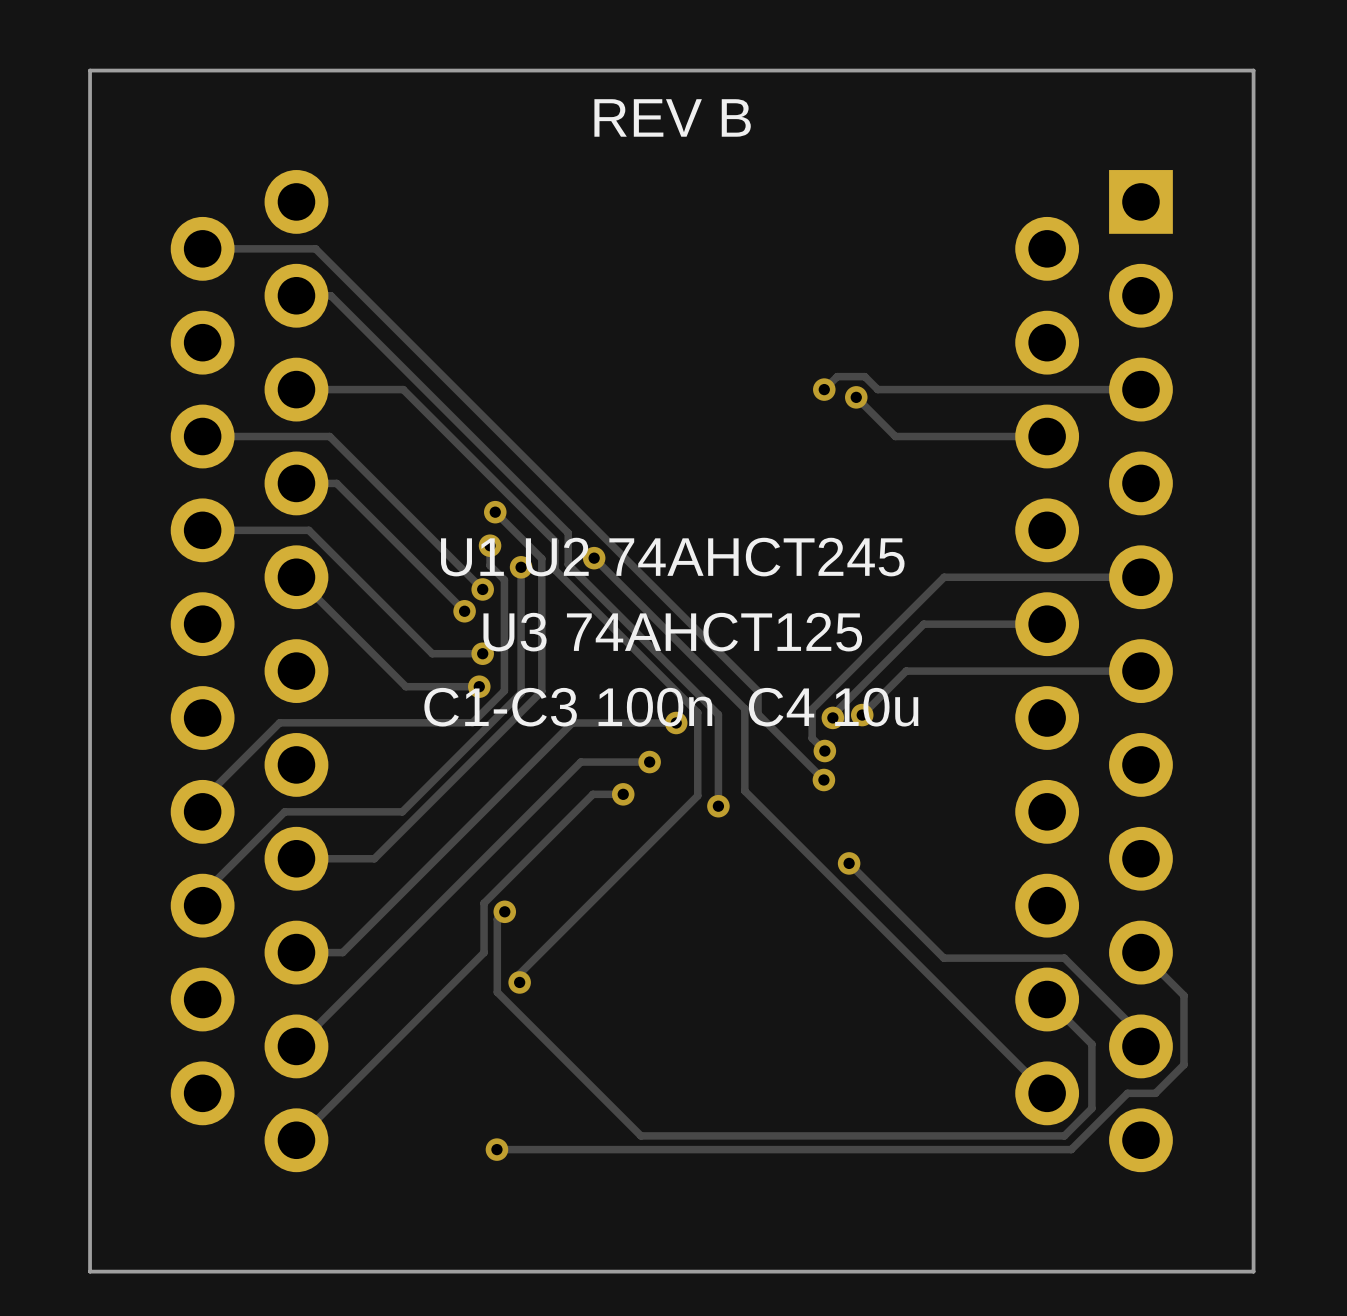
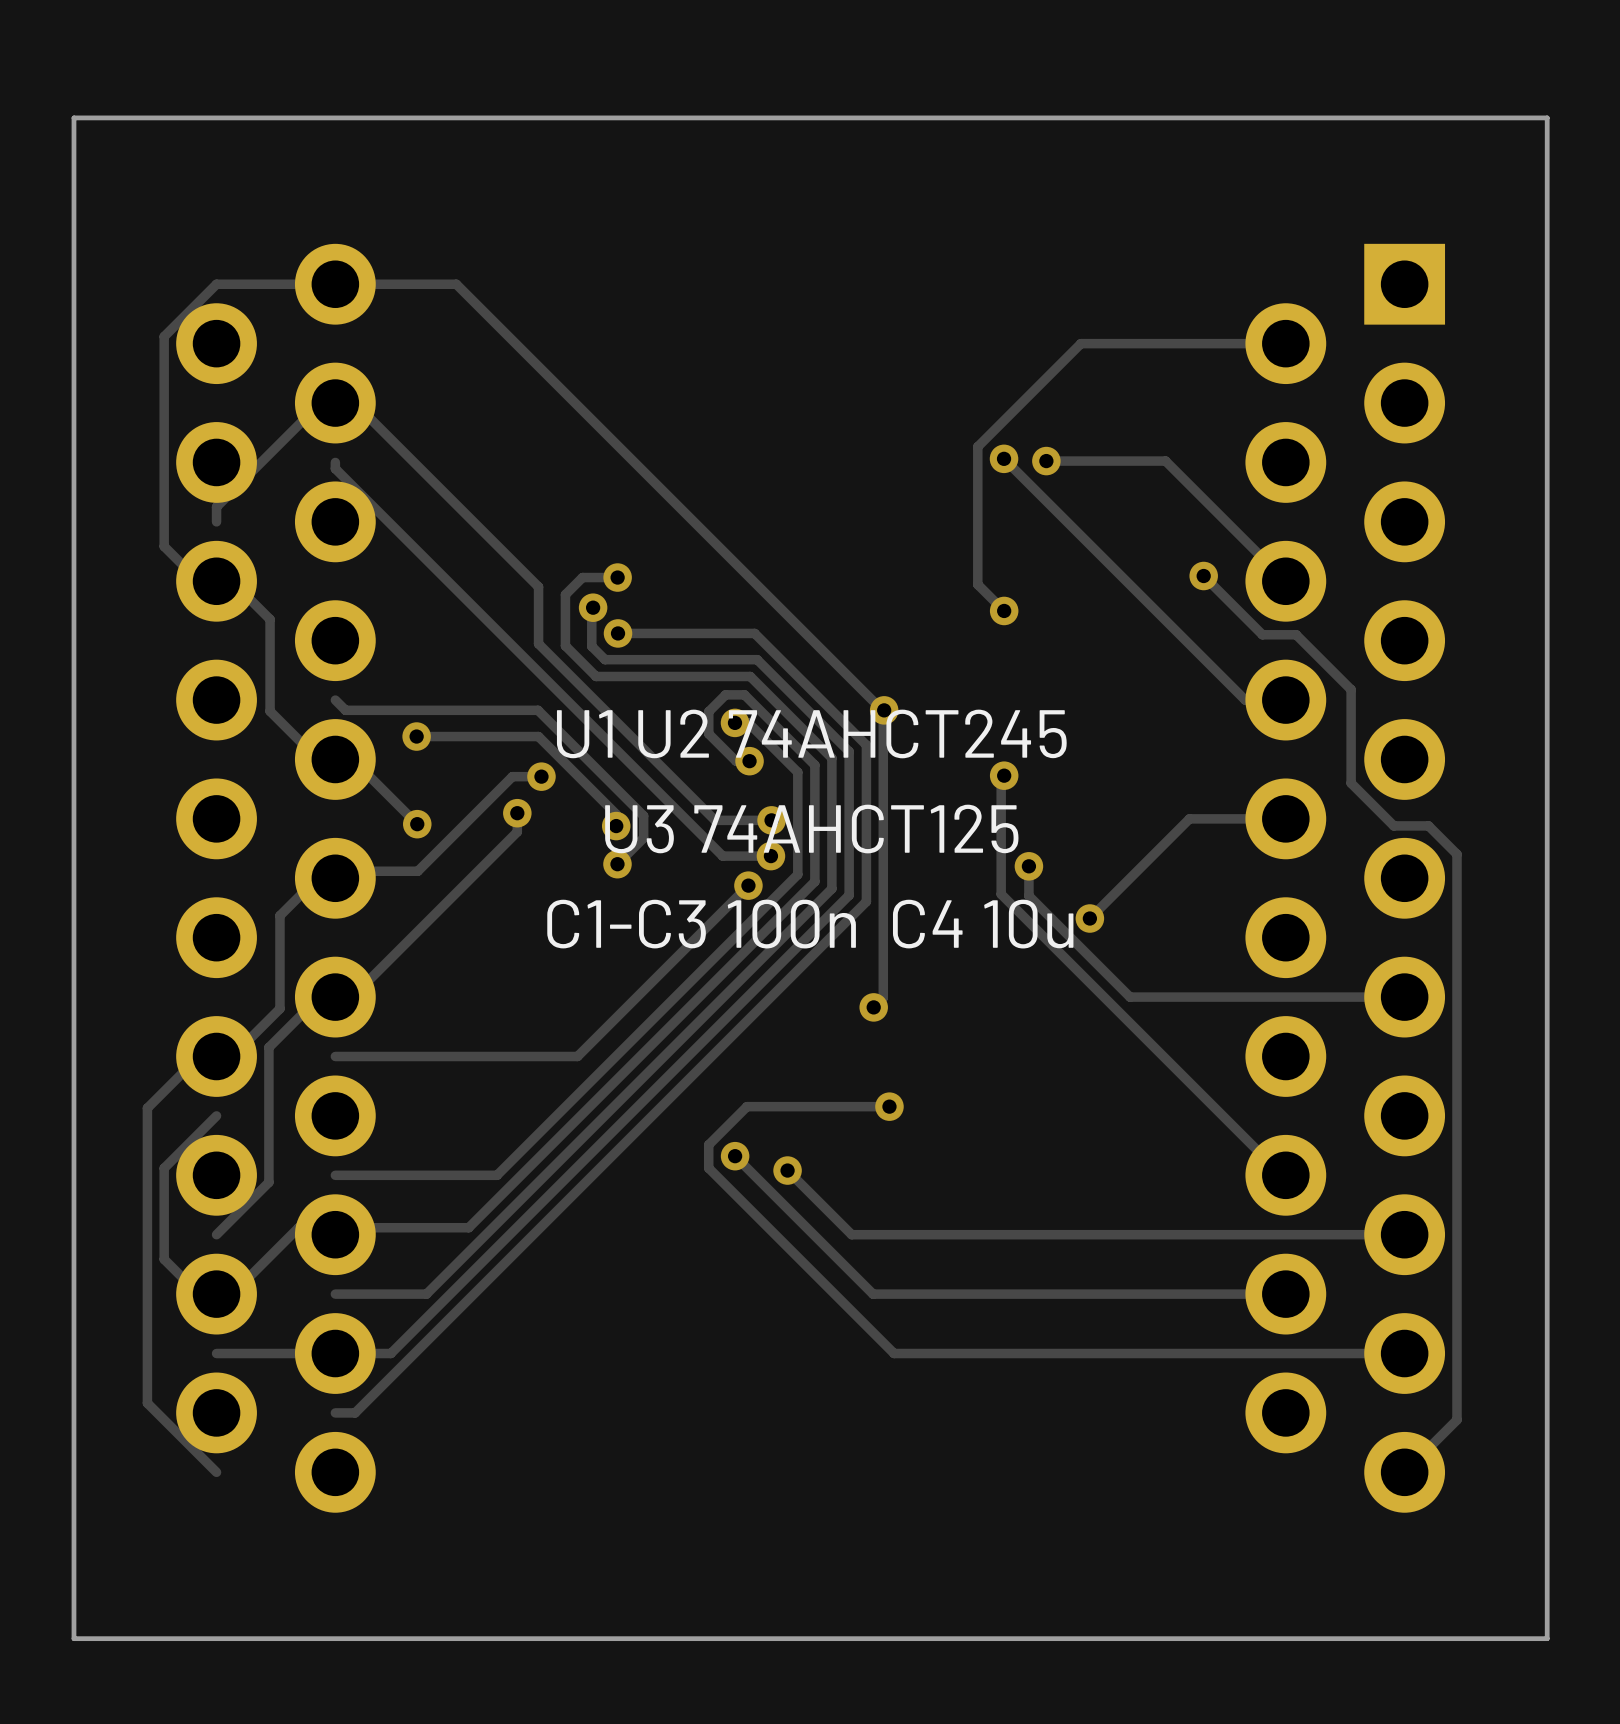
text: REV B (672, 117) -> none
track: (202, 248) (315, 248) (758, 691) (758, 714) (823, 780) -> none
track: none -> (1285, 343) (1080, 343) (977, 446) (977, 584) (1004, 610)
track: (296, 295) (330, 295) (568, 533) (568, 564) (718, 714) (718, 806) -> none
track: none -> (1004, 458) (1245, 700) (1285, 700)
via: none -> (1004, 458)
via: none -> (1046, 461)
track: none -> (335, 462) (335, 468) (722, 856) (770, 856)
track: none -> (216, 521) (216, 507) (314, 409) (361, 409) (538, 586) (538, 643) (715, 820) (771, 820)
track: (296, 389) (403, 389) (555, 541) (555, 569) (697, 712) (697, 795) (519, 973) (519, 982) -> none
via: (824, 389) -> none
track: (1140, 389) (877, 389) (864, 376) (837, 376) (824, 389) -> none
track: (856, 397) (895, 436) (1047, 436) -> (1046, 461) (1165, 461) (1285, 581)
via: (856, 397) -> none
track: none -> (1203, 576) (1262, 634) (1296, 634) (1351, 689) (1351, 783) (1393, 825) (1428, 825) (1457, 854) (1457, 1419) (1404, 1472)
via: none -> (1203, 576)
track: none -> (617, 577) (582, 577) (565, 594) (565, 645) (596, 676) (750, 676) (831, 758) (831, 888) (426, 1294) (335, 1294)
via: none -> (617, 577)
track: (202, 436) (329, 436) (482, 589) -> none
track: none -> (593, 607) (591, 646) (605, 659) (757, 659) (849, 751) (849, 895) (390, 1353) (216, 1353)
via: none -> (593, 607)
via: none -> (1004, 610)
track: none -> (618, 633) (754, 633) (866, 745) (866, 901) (355, 1412) (335, 1412)
via: none -> (618, 633)
track: (296, 483) (336, 483) (464, 611) -> none
track: (495, 512) (541, 558) (541, 691) (374, 858) (296, 858) -> none
via: (495, 512) -> none
track: (202, 530) (308, 530) (432, 653) (482, 653) -> none
track: none -> (335, 700) (345, 710) (538, 710) (643, 815) (643, 838) (617, 864)
via: none -> (884, 710)
track: none -> (883, 711) (456, 284) (216, 284) (164, 336) (164, 546) (206, 588) (238, 588) (270, 619) (270, 711) (325, 766) (359, 766) (417, 824)
track: none -> (883, 711) (883, 997) (873, 1007)
track: (490, 545) (490, 565) (504, 579) (504, 690) (472, 722) (279, 722) (202, 799) (202, 811) -> none
via: (490, 545) -> none
track: none -> (735, 722) (748, 722) (797, 772) (797, 874) (497, 1175) (335, 1175)
track: (594, 558) (744, 708) (744, 791) (1047, 1093) -> none
via position: (594, 558) -> (735, 722)
track: none -> (416, 736) (538, 736) (616, 814) (616, 826)
via: none -> (416, 736)
track: (521, 567) (521, 693) (402, 811) -> (748, 885) (577, 1056) (469, 1056)
via: (521, 567) -> none
track: (296, 577) (405, 686) (479, 686) -> none
track: (1140, 577) (944, 577) (812, 709) (812, 738) (824, 751) -> none
track: none -> (749, 761) (736, 761) (708, 733) (708, 711) (725, 694) (744, 694) (814, 765) (814, 881) (468, 1227) (298, 1227) (239, 1287) (191, 1287) (164, 1259) (164, 1168) (216, 1115)
via: none -> (749, 761)
via: (482, 589) -> none
track: none -> (541, 776) (512, 776) (417, 871) (324, 871) (279, 915) (279, 1008) (226, 1062) (193, 1062) (147, 1108) (147, 1403) (216, 1472)
track: none -> (1004, 775) (1001, 778) (1001, 894) (1282, 1175) (1285, 1175)
via: none -> (1004, 775)
via position: (464, 611) -> (541, 776)
track: none -> (517, 813) (517, 831) (358, 991) (325, 991) (268, 1047) (268, 1182) (216, 1234)
via: none -> (517, 813)
track: (971, 624) (923, 624) (832, 715) (832, 717) -> (1189, 818) (1089, 918)
via: none -> (771, 820)
via: none -> (417, 824)
via: none -> (616, 826)
via: (482, 653) -> none
via: none -> (770, 856)
via: none -> (617, 864)
track: none -> (1028, 866) (1028, 895) (1130, 997) (1404, 997)
via: none -> (1028, 866)
track: (1140, 671) (906, 671) (862, 715) -> none
via: none -> (748, 885)
via: (479, 686) -> none
via: none -> (1089, 918)
via: (862, 715) -> none
via: (832, 717) -> none
track: (676, 722) (572, 722) (342, 952) (296, 952) -> none
via: (676, 722) -> none
via: (824, 751) -> none
track: (649, 762) (580, 762) (296, 1046) -> none
via: (649, 762) -> none
via: none -> (873, 1007)
via: (823, 780) -> none
track: (623, 794) (592, 794) (484, 903) (484, 952) (296, 1140) -> none
via: (623, 794) -> none
via: (718, 806) -> none
track: (296, 811) (284, 811) (202, 893) (202, 905) -> none
via: none -> (889, 1106)
track: (849, 863) (943, 958) (1064, 958) (1140, 1034) (1140, 1046) -> (889, 1106) (746, 1106) (708, 1144) (708, 1168) (894, 1353) (1404, 1353)
via: (849, 863) -> none
via: none -> (735, 1156)
via: none -> (787, 1170)
track: (504, 911) (497, 919) (497, 992) (640, 1135) (1064, 1135) (1091, 1108) (1091, 1044) (1047, 999) -> (735, 1156) (873, 1294) (1285, 1294)
via: (504, 911) -> none
track: (1140, 952) (1183, 995) (1183, 1064) (1155, 1093) (1127, 1093) (1071, 1149) (496, 1149) -> (1404, 1234) (851, 1234) (787, 1170)
via: (519, 982) -> none
via: (496, 1149) -> none

